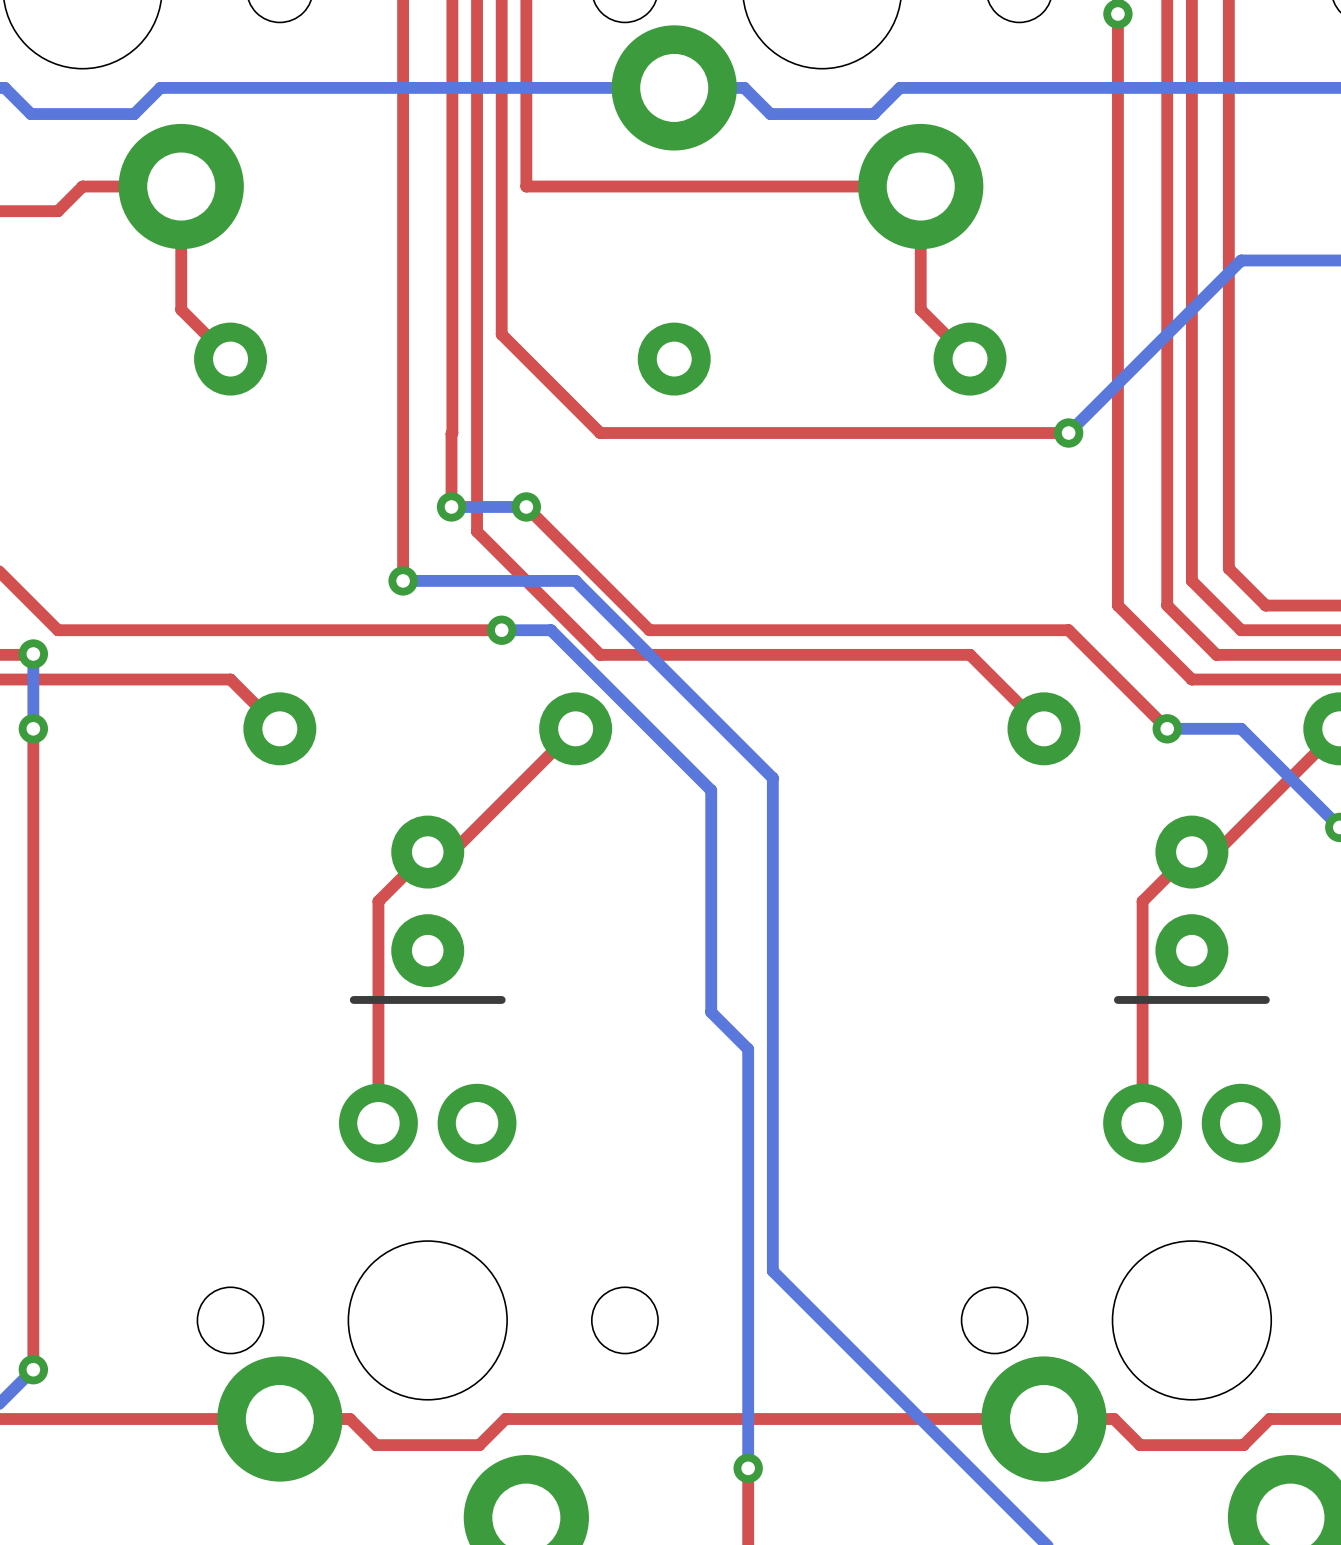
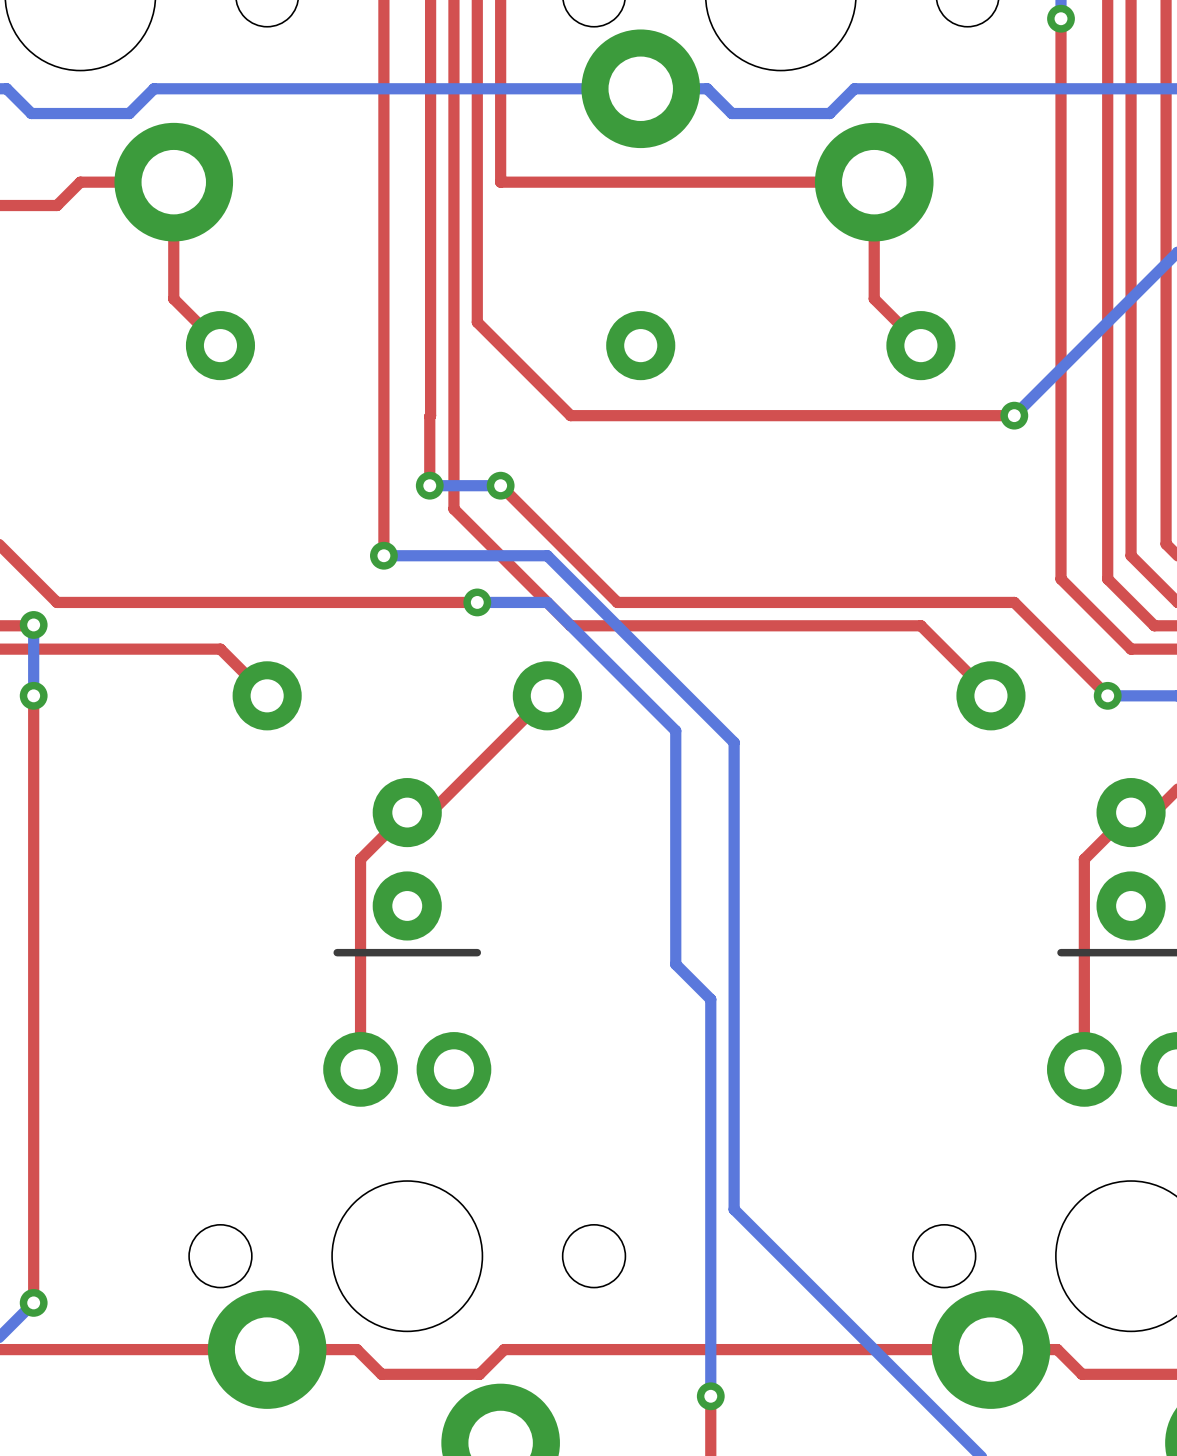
bottom track: (550, 630) (711, 790) -> (523, 602) (547, 602) (675, 730) (675, 754)
top track: (349, 1419) (376, 1445) (400, 1445) -> (333, 1349) (356, 1349) (381, 1374)
top track: (530, 1419) (505, 1419) (479, 1445) -> (504, 1349) (479, 1374) (456, 1374)

